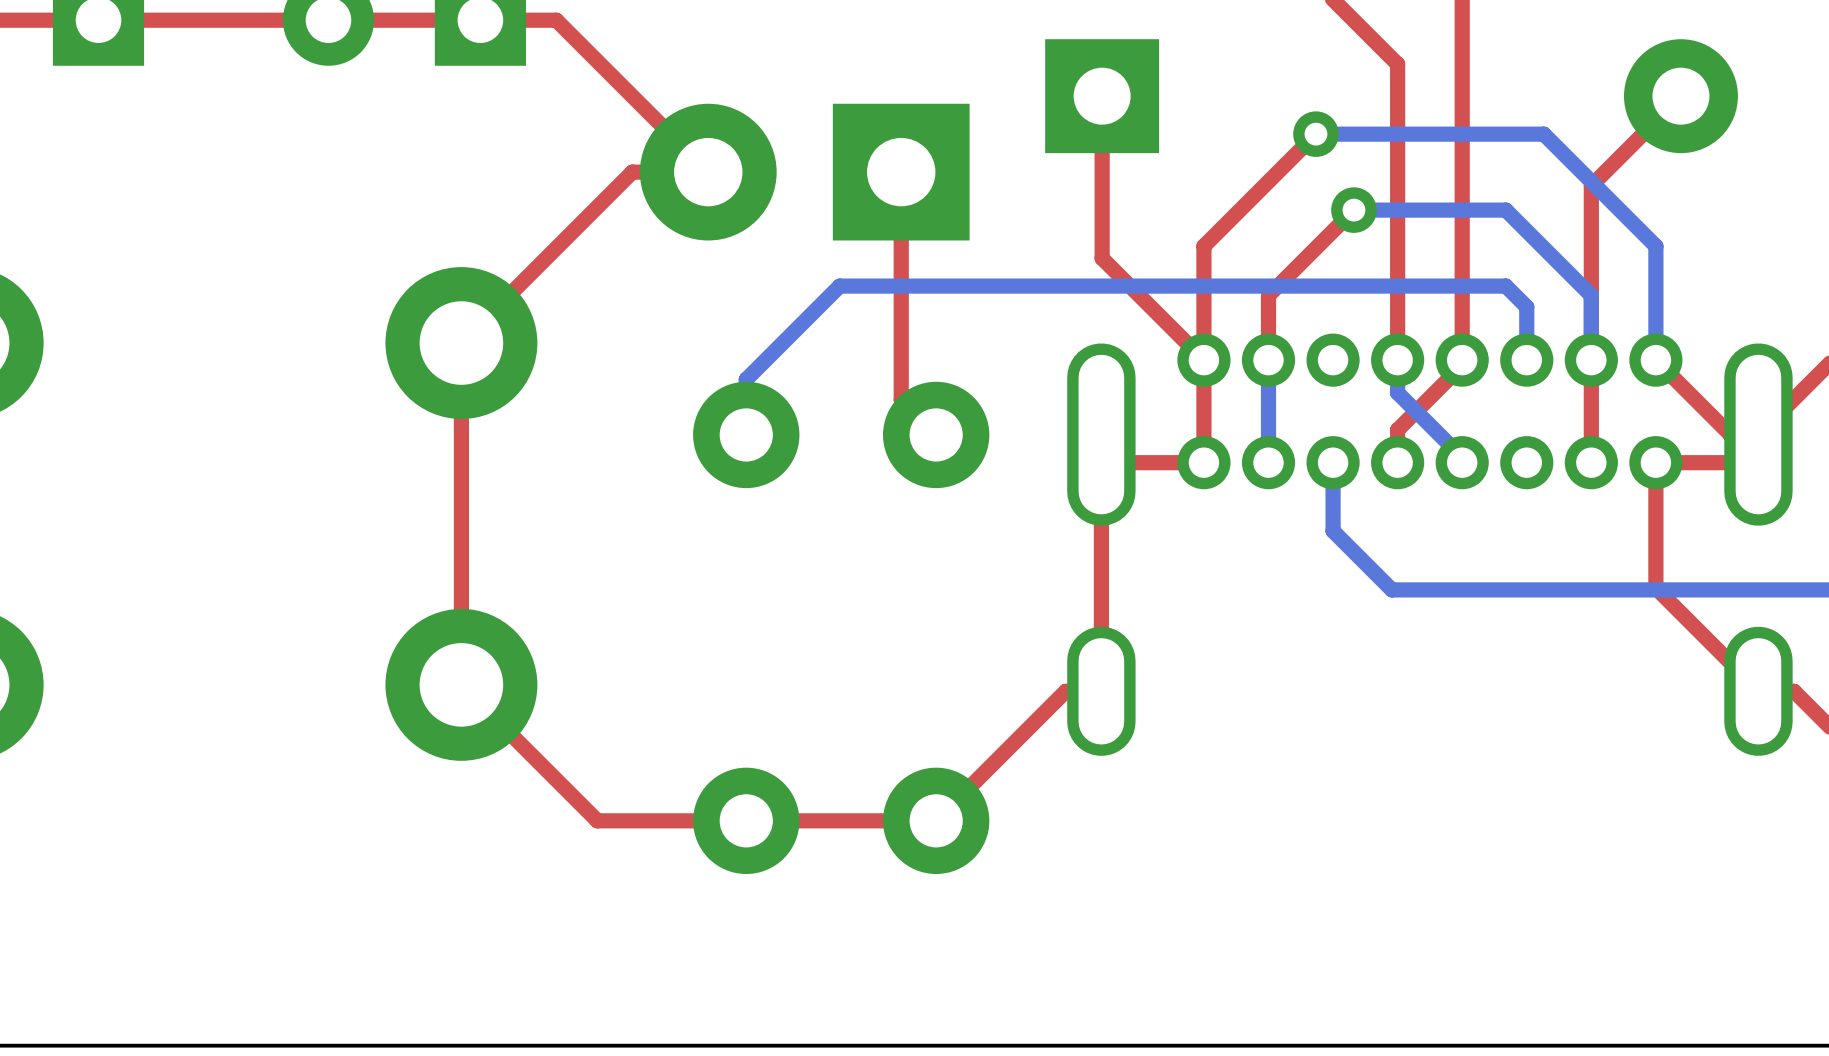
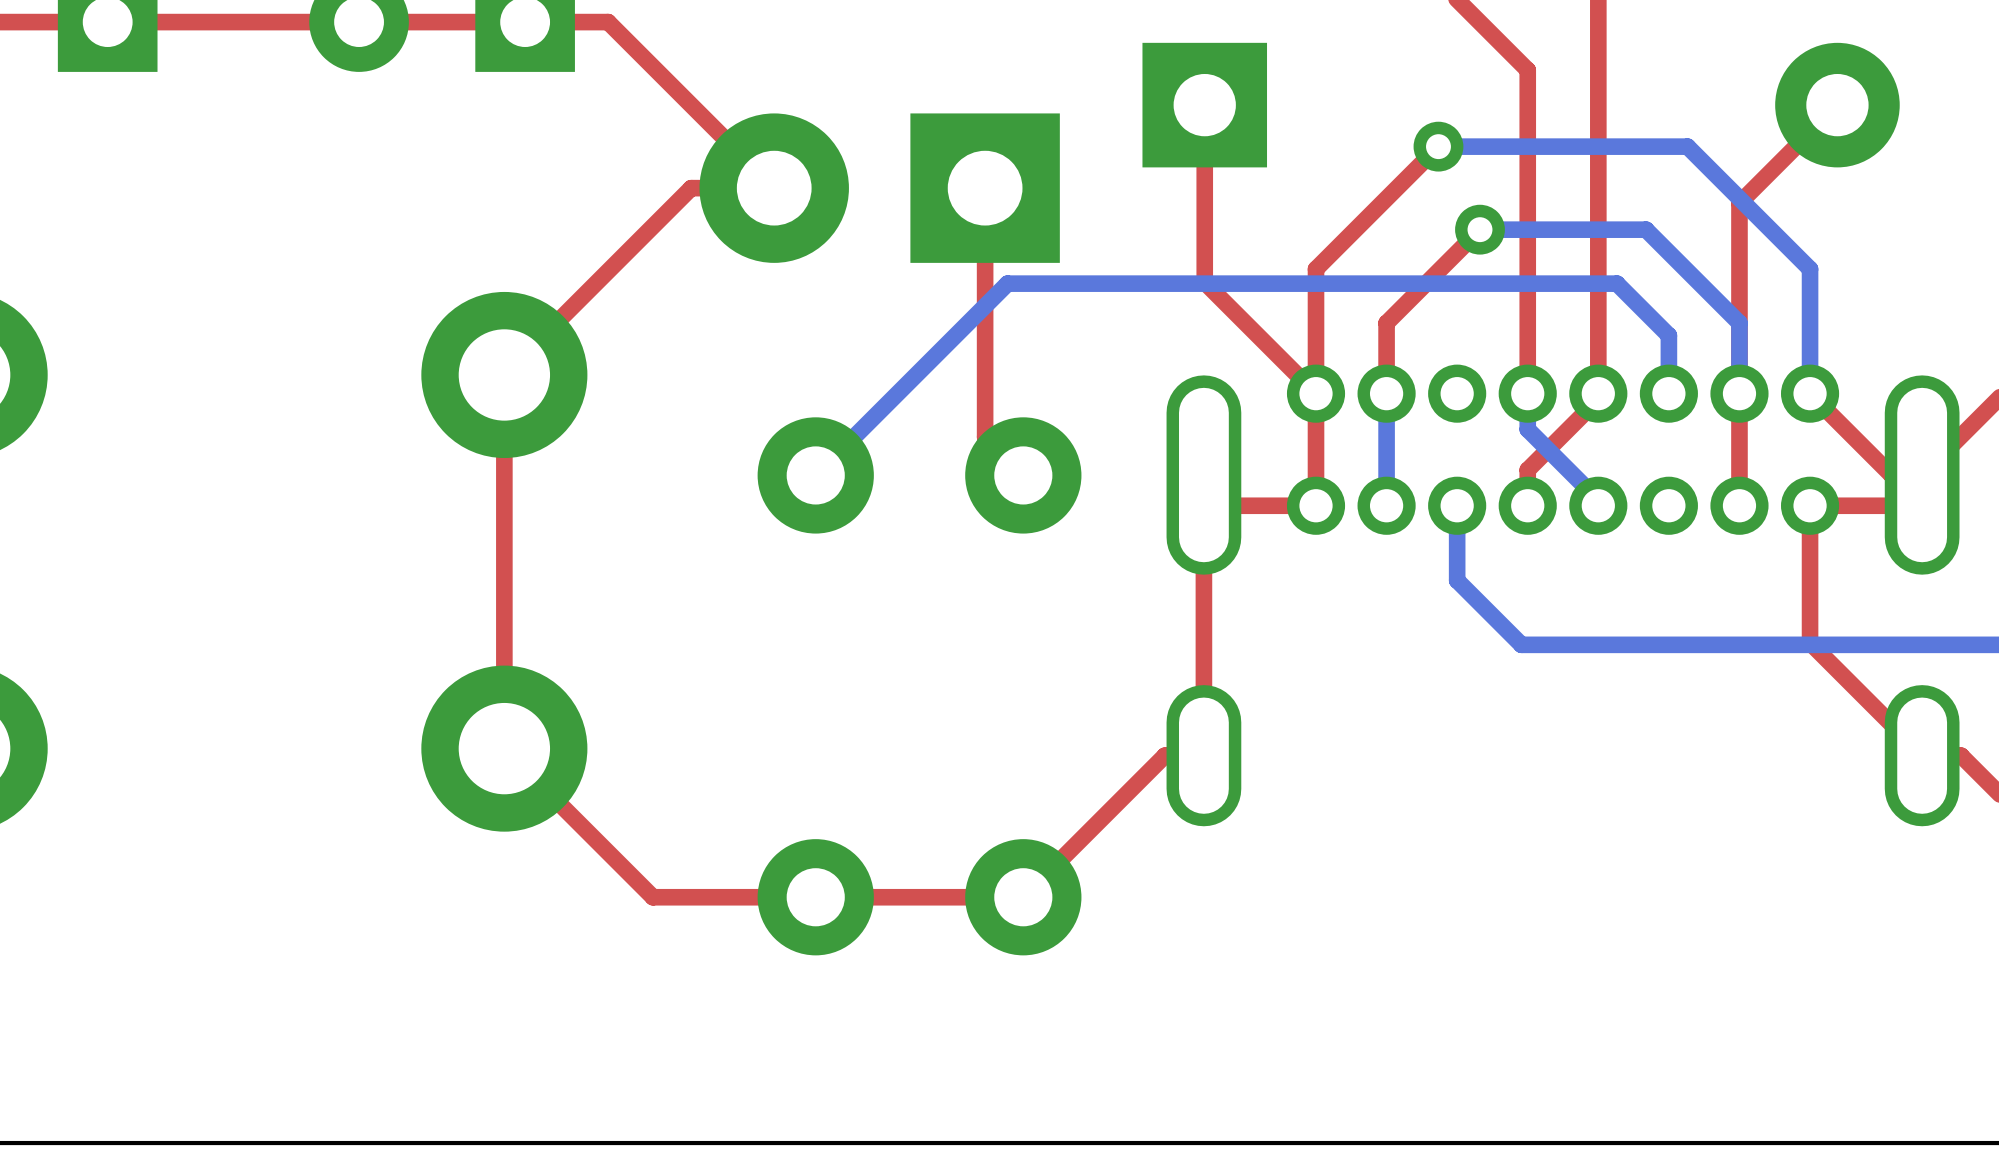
bottom track: (1505, 286) (839, 286) (746, 379) (746, 434) -> (1646, 312) (1617, 283) (1007, 283) (815, 475)

